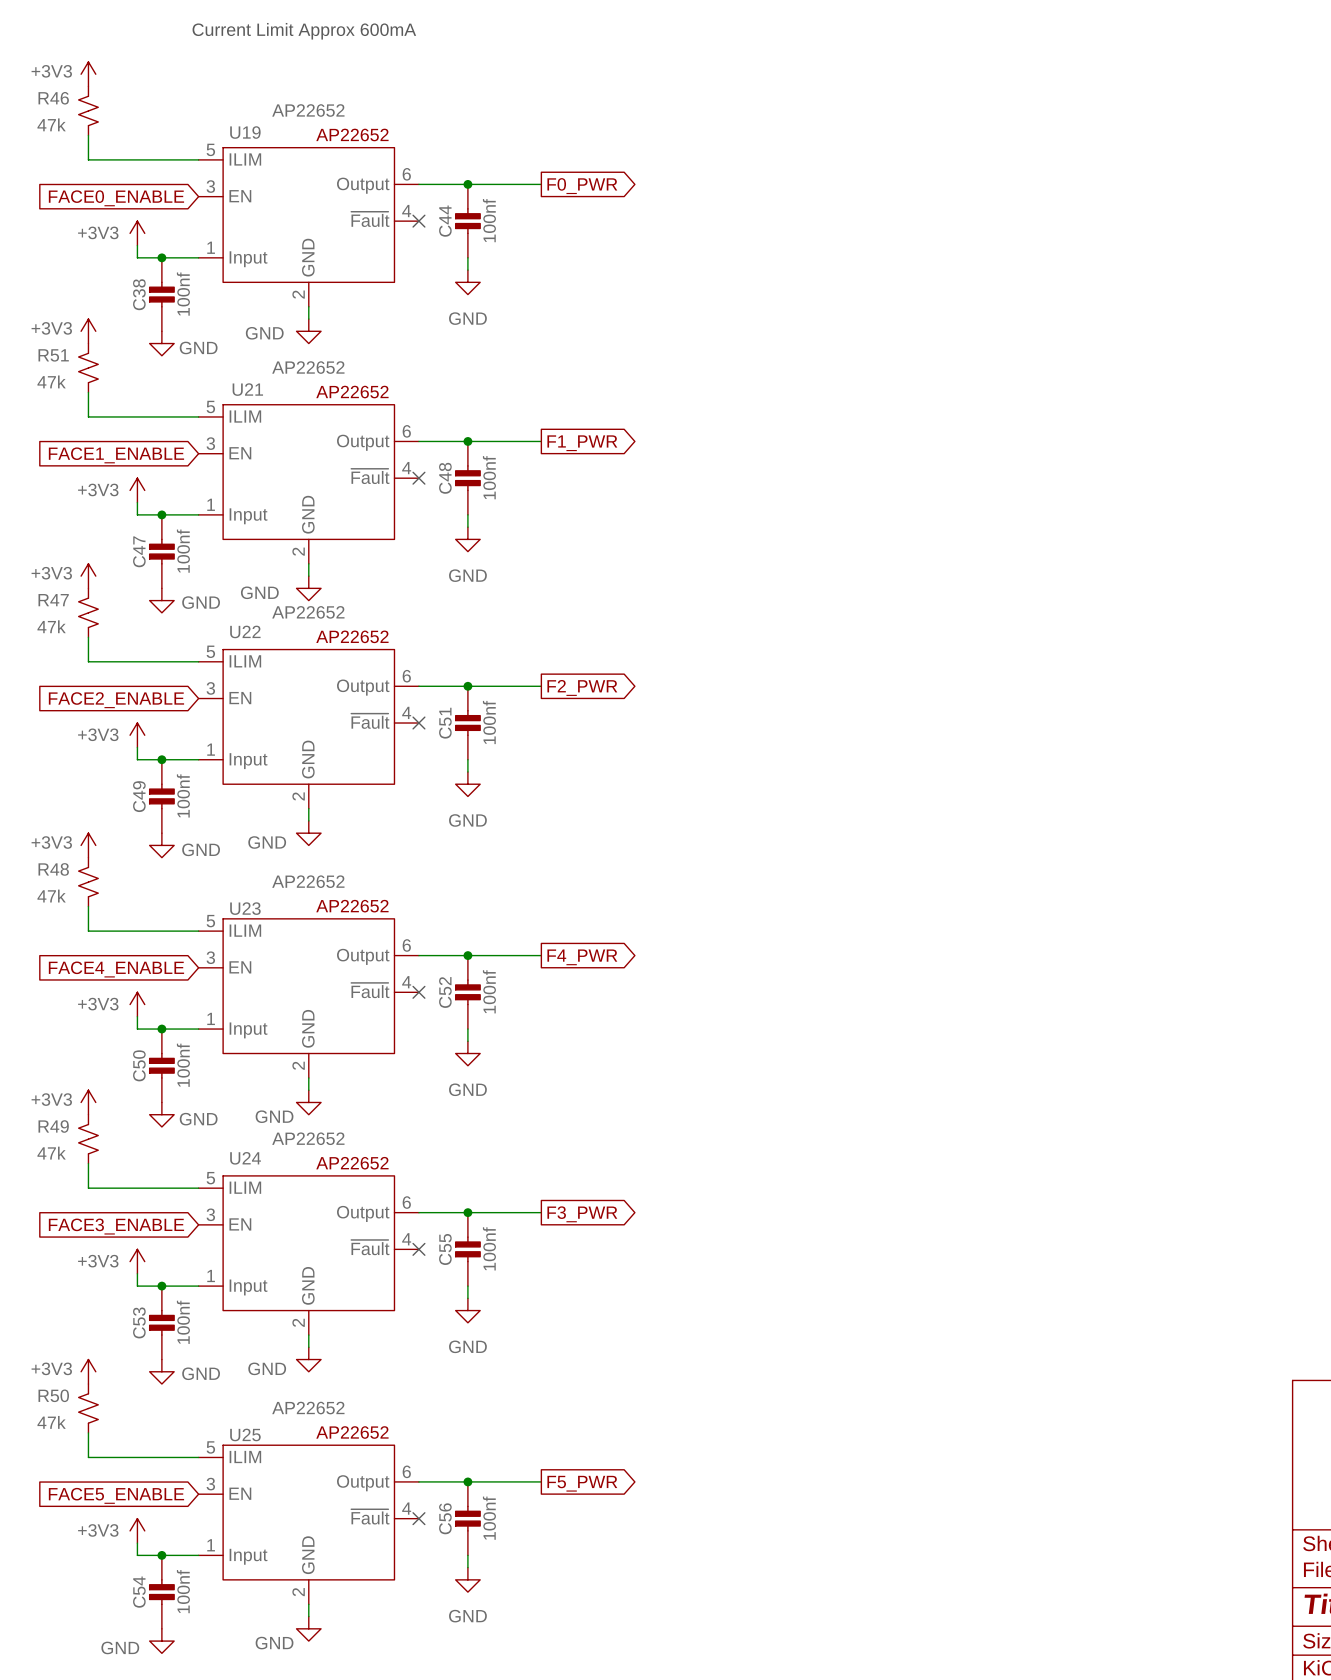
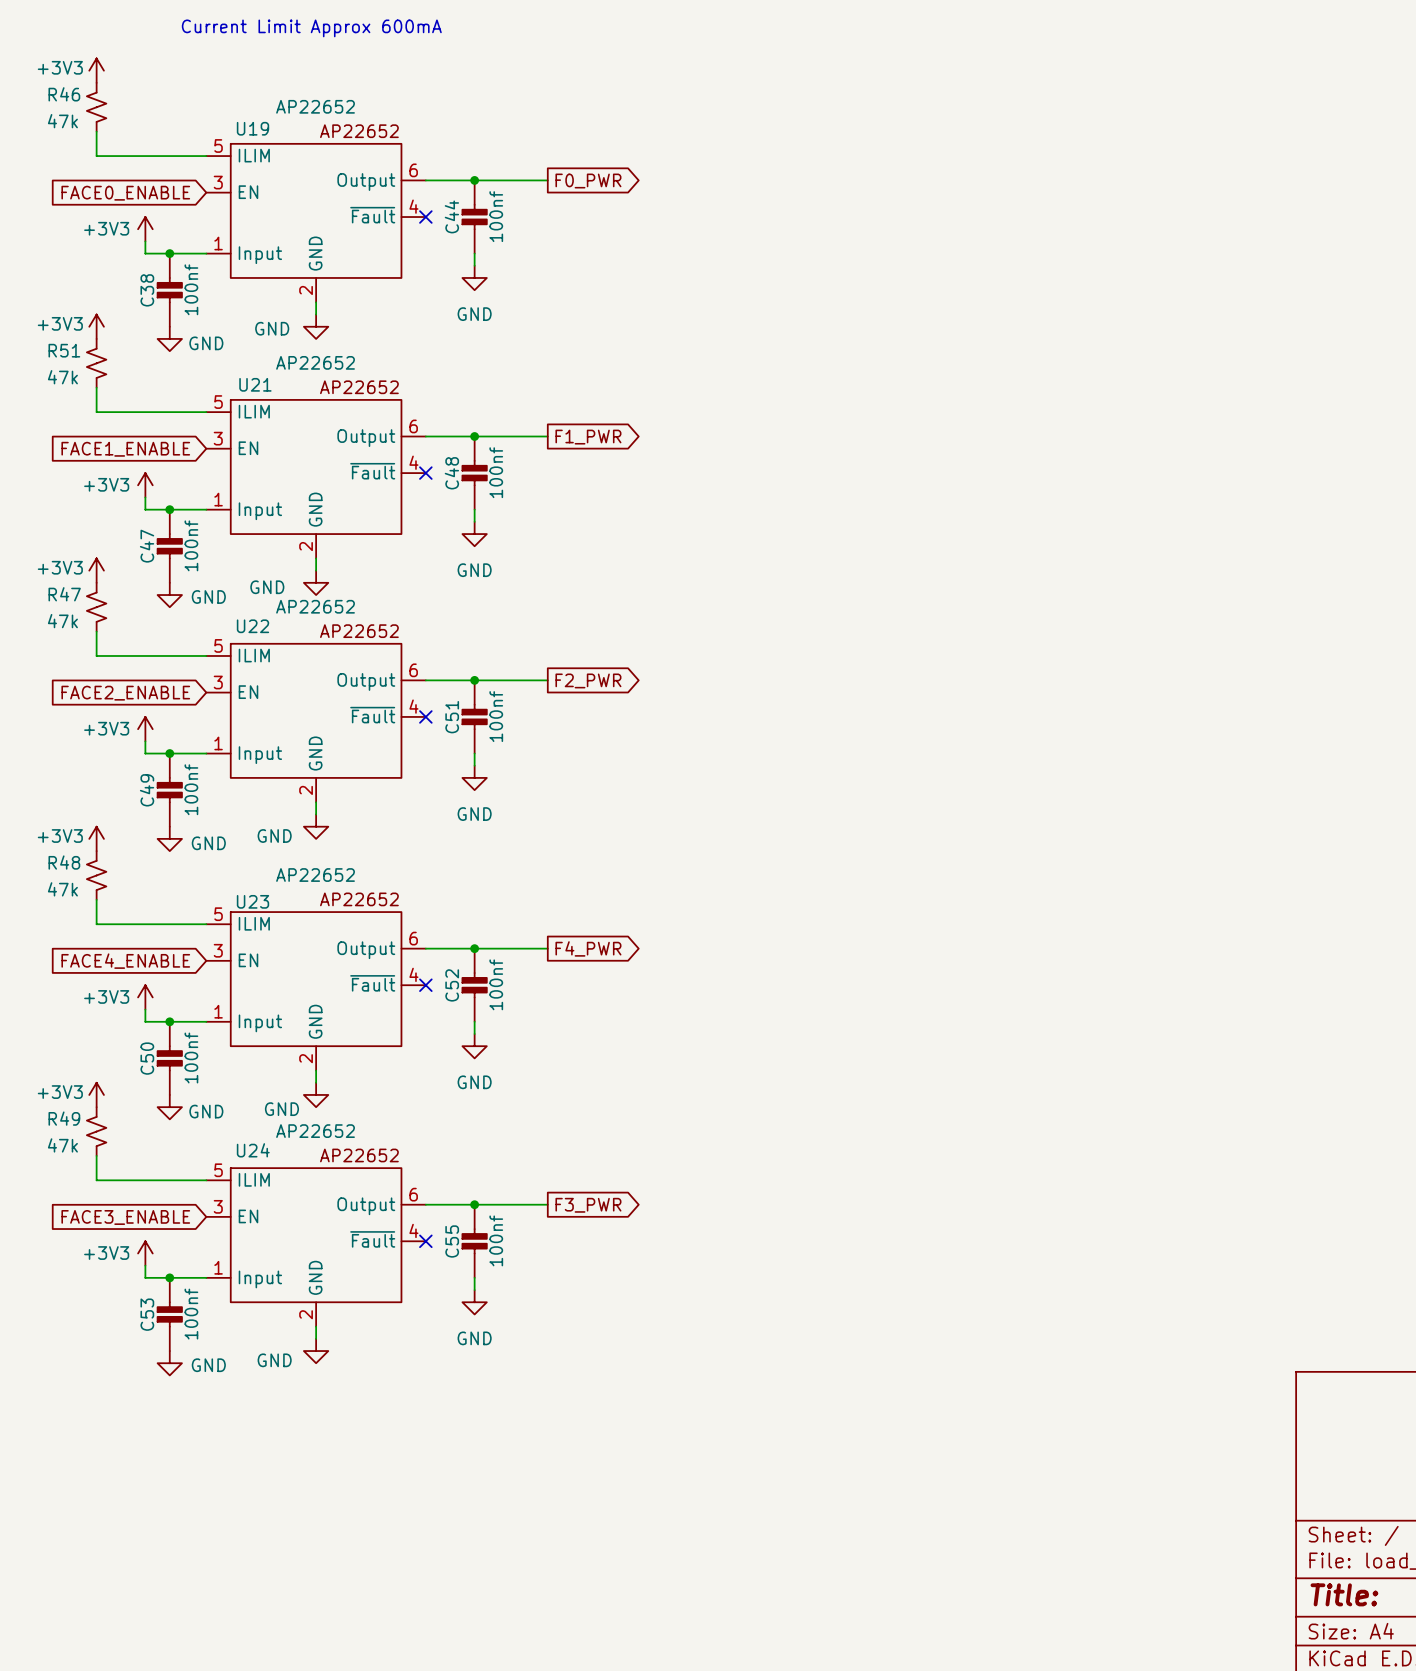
power symbol: +3V3 (88, 1371) -> none
R50: 47k (88, 1408) -> none
wire: (88, 1432) (88, 1457) (198, 1457) -> none
wire: (418, 1481) (541, 1481) -> none
junction: (467, 1481) -> none
global label: F5_PWR (582, 1483) -> none
global label: FACE5_ENABLE (116, 1495) -> none
no-connect mark: (418, 1518) -> none
C56: 100nf (467, 1518) -> none
U25: AP22652 (308, 1524) -> none
power symbol: +3V3 (137, 1530) -> none
wire: (137, 1543) (137, 1555) (198, 1555) -> none
junction: (161, 1555) -> none
wire: (467, 1555) (467, 1567) -> none
power symbol: GND (467, 1579) -> none
C54: 100nf (161, 1592) -> none
wire: (308, 1604) (308, 1616) -> none
power symbol: GND (308, 1628) -> none
power symbol: GND (161, 1641) -> none

